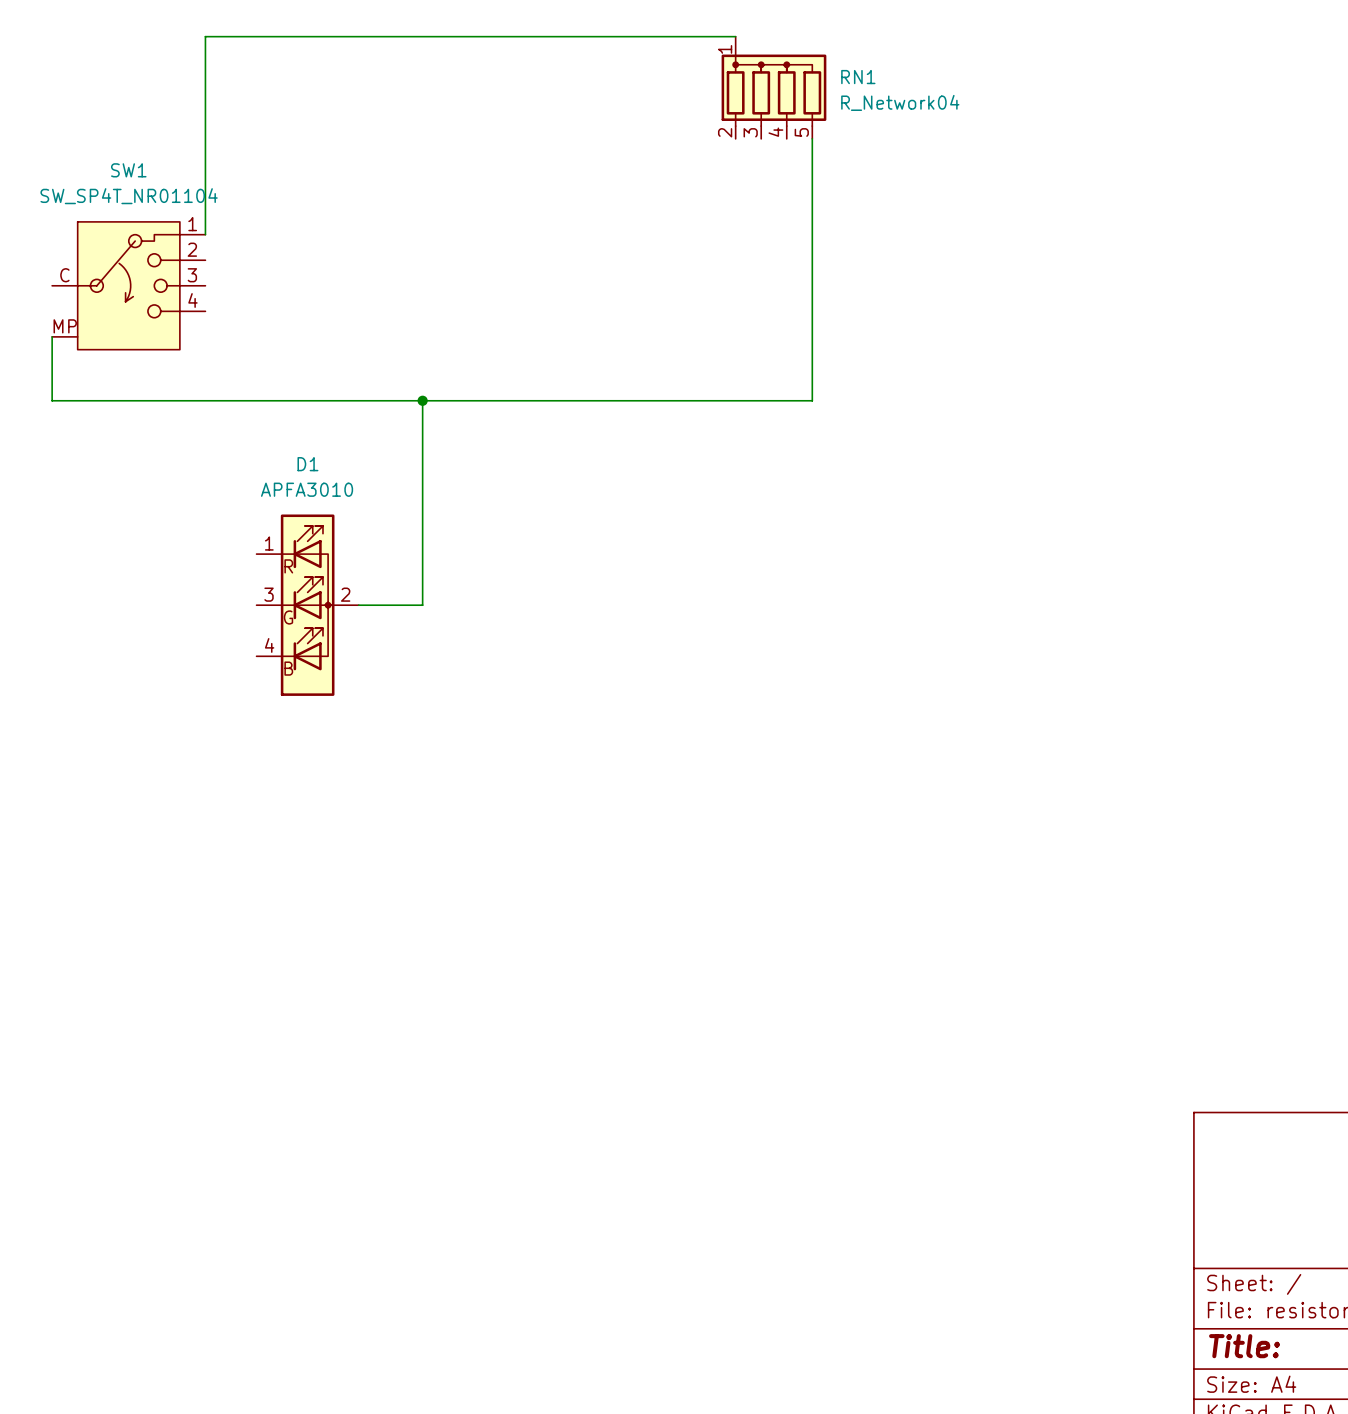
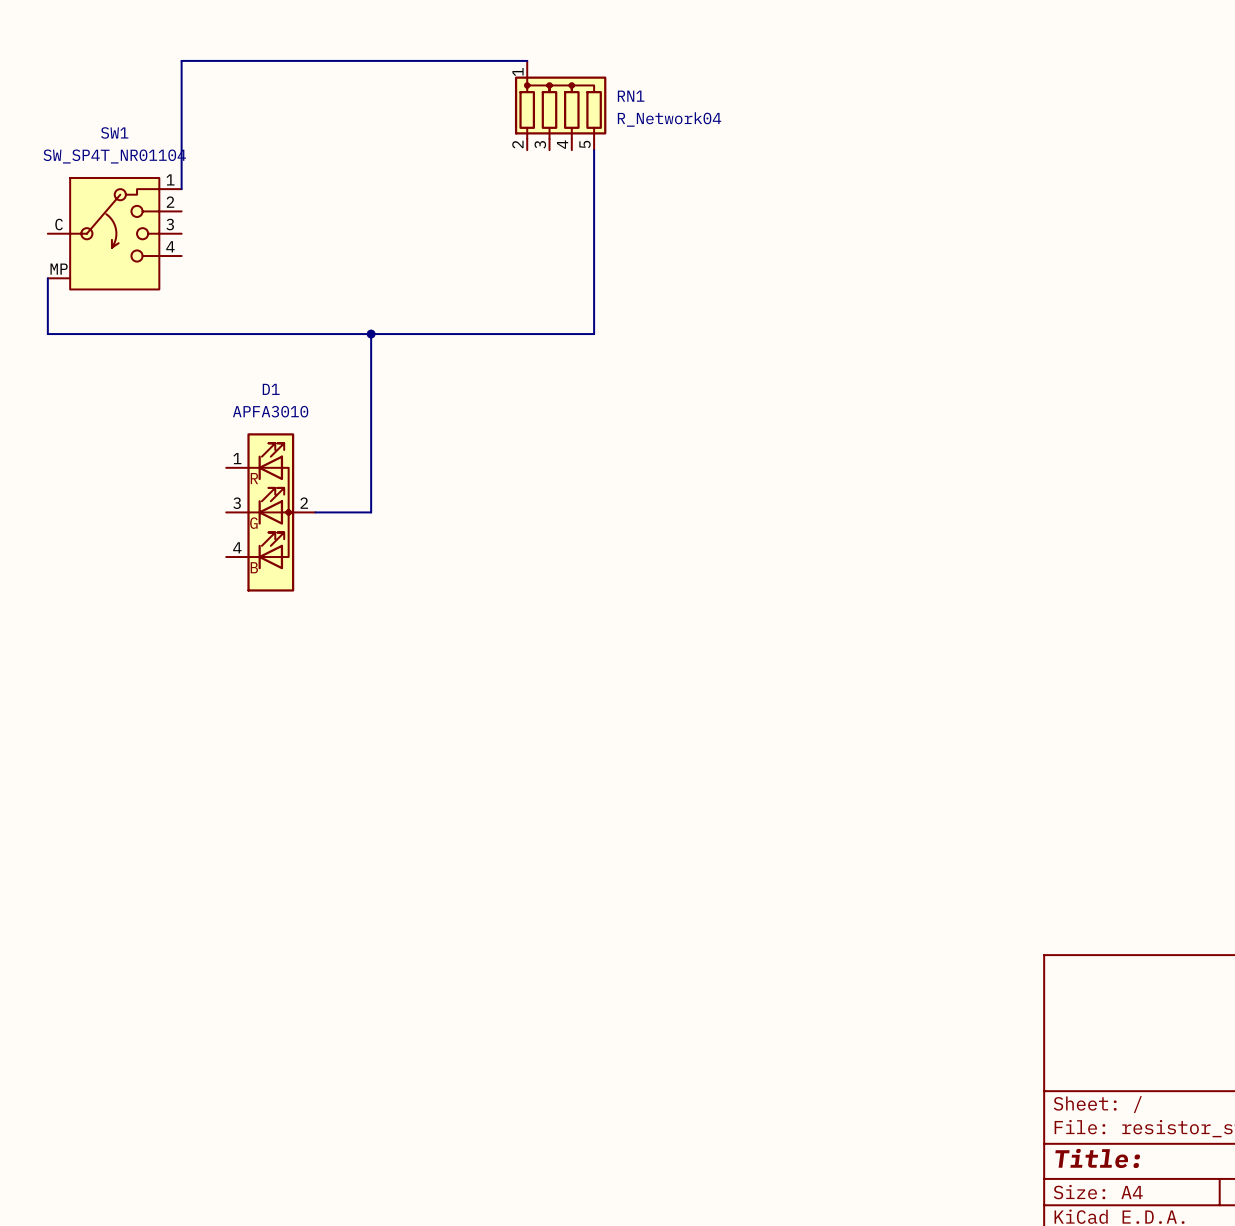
wire: (735, 36) (205, 36) (205, 87) -> (527, 60) (181, 60)
RN1 position: (773, 87) -> (560, 105)
wire: (812, 138) (812, 400) (678, 400) -> (594, 150) (594, 334)

